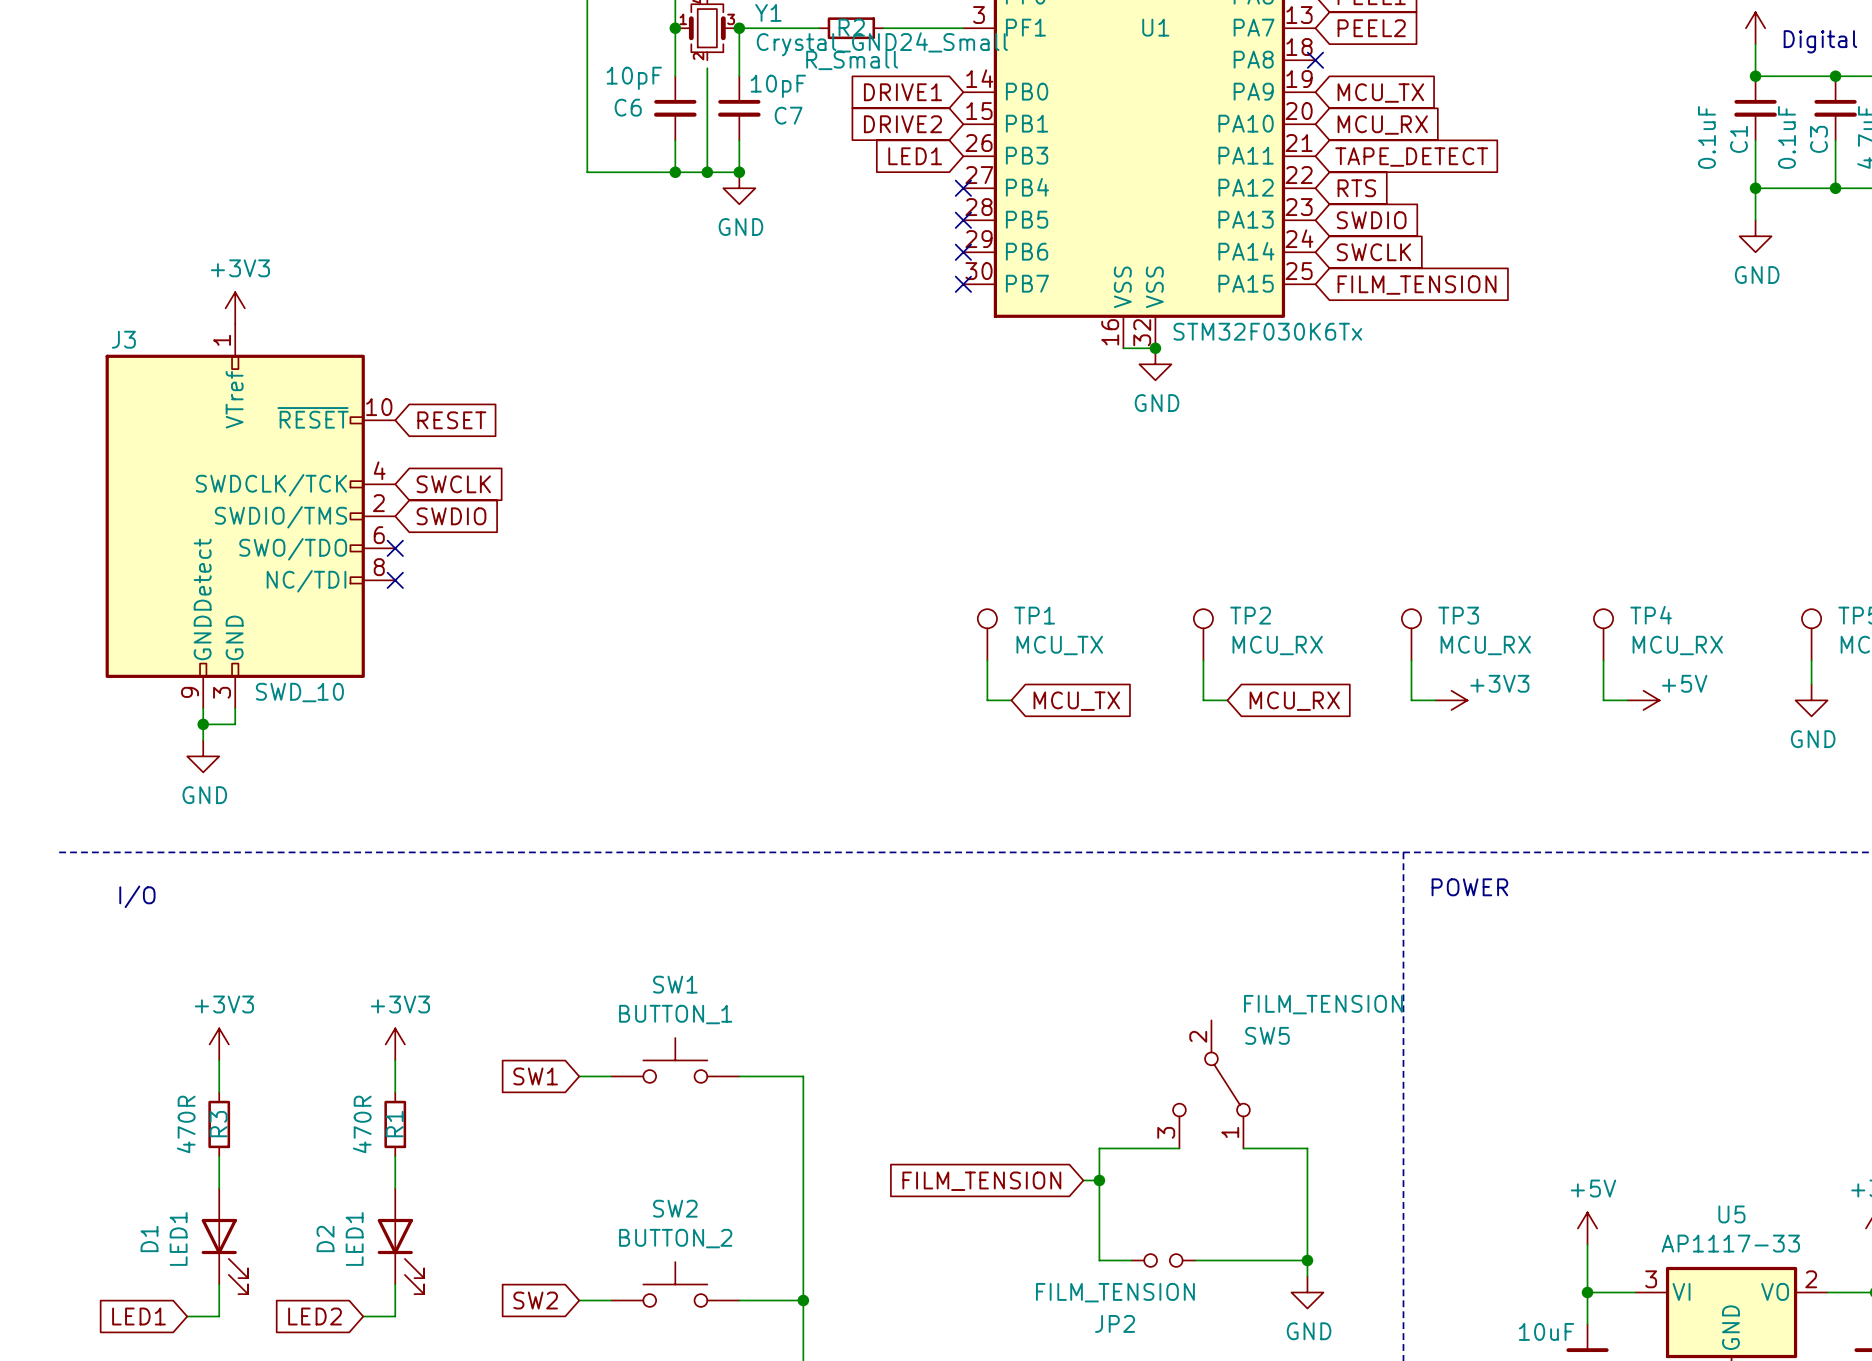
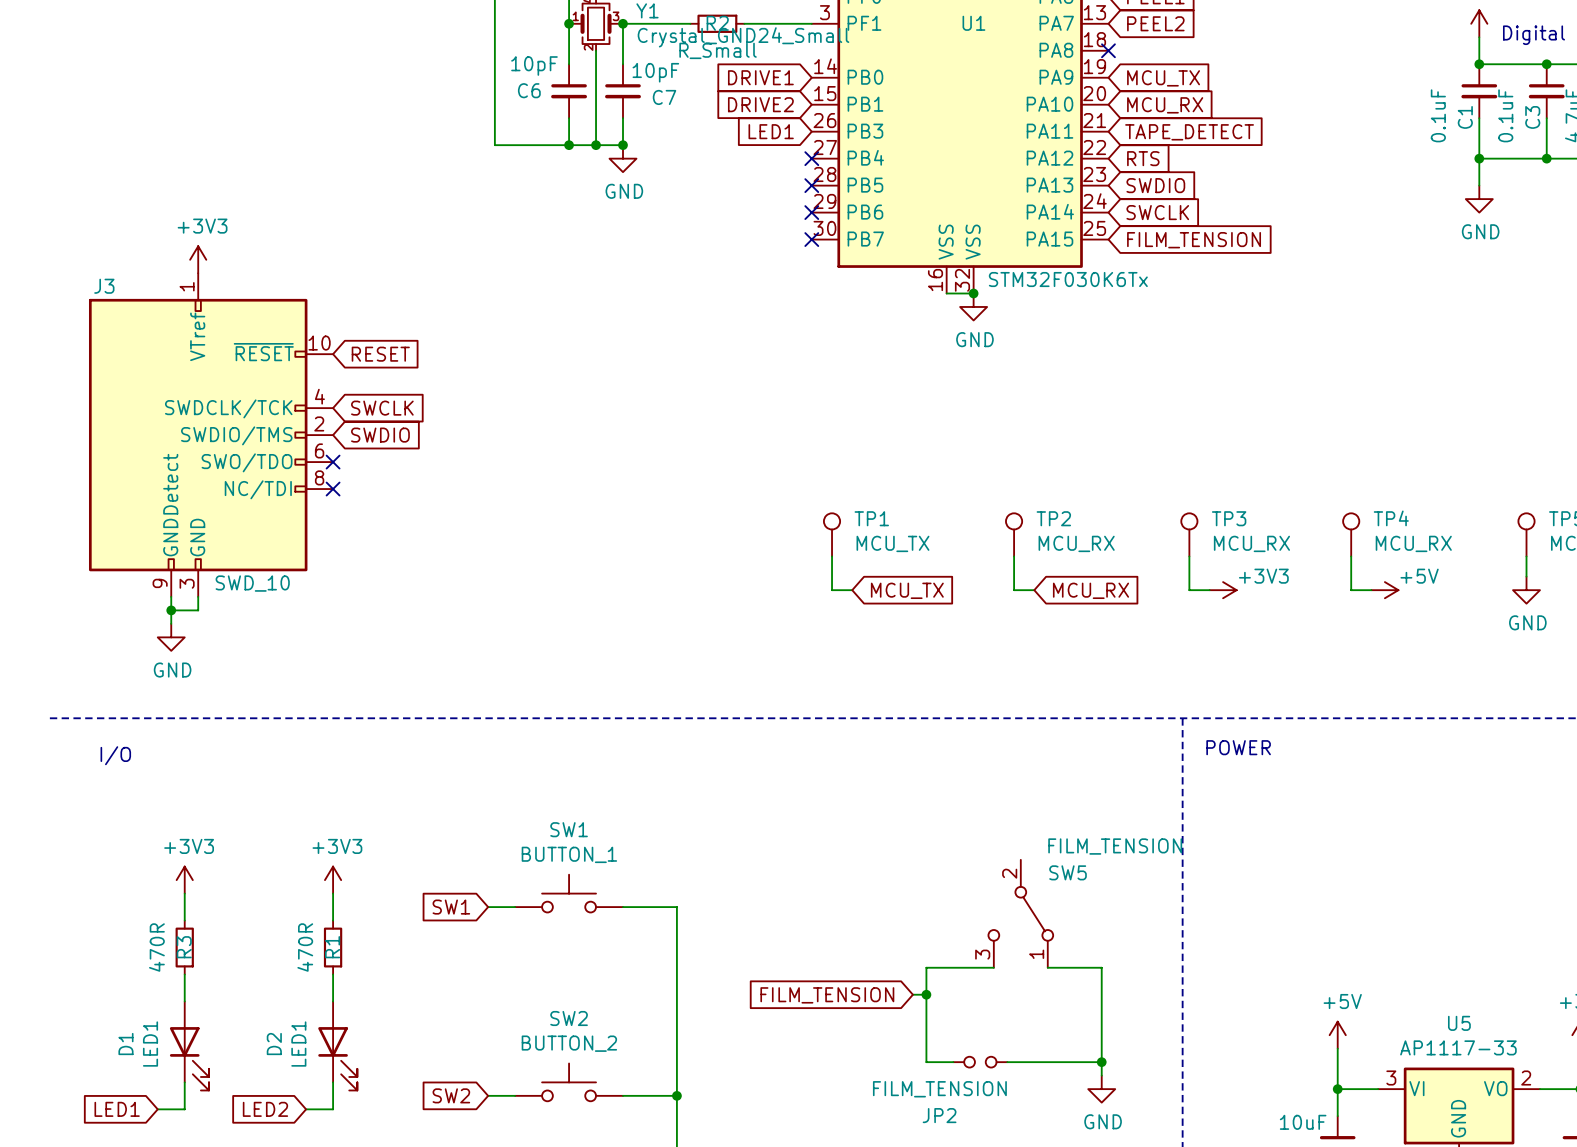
wire: none -> (596, 50) (596, 57)

